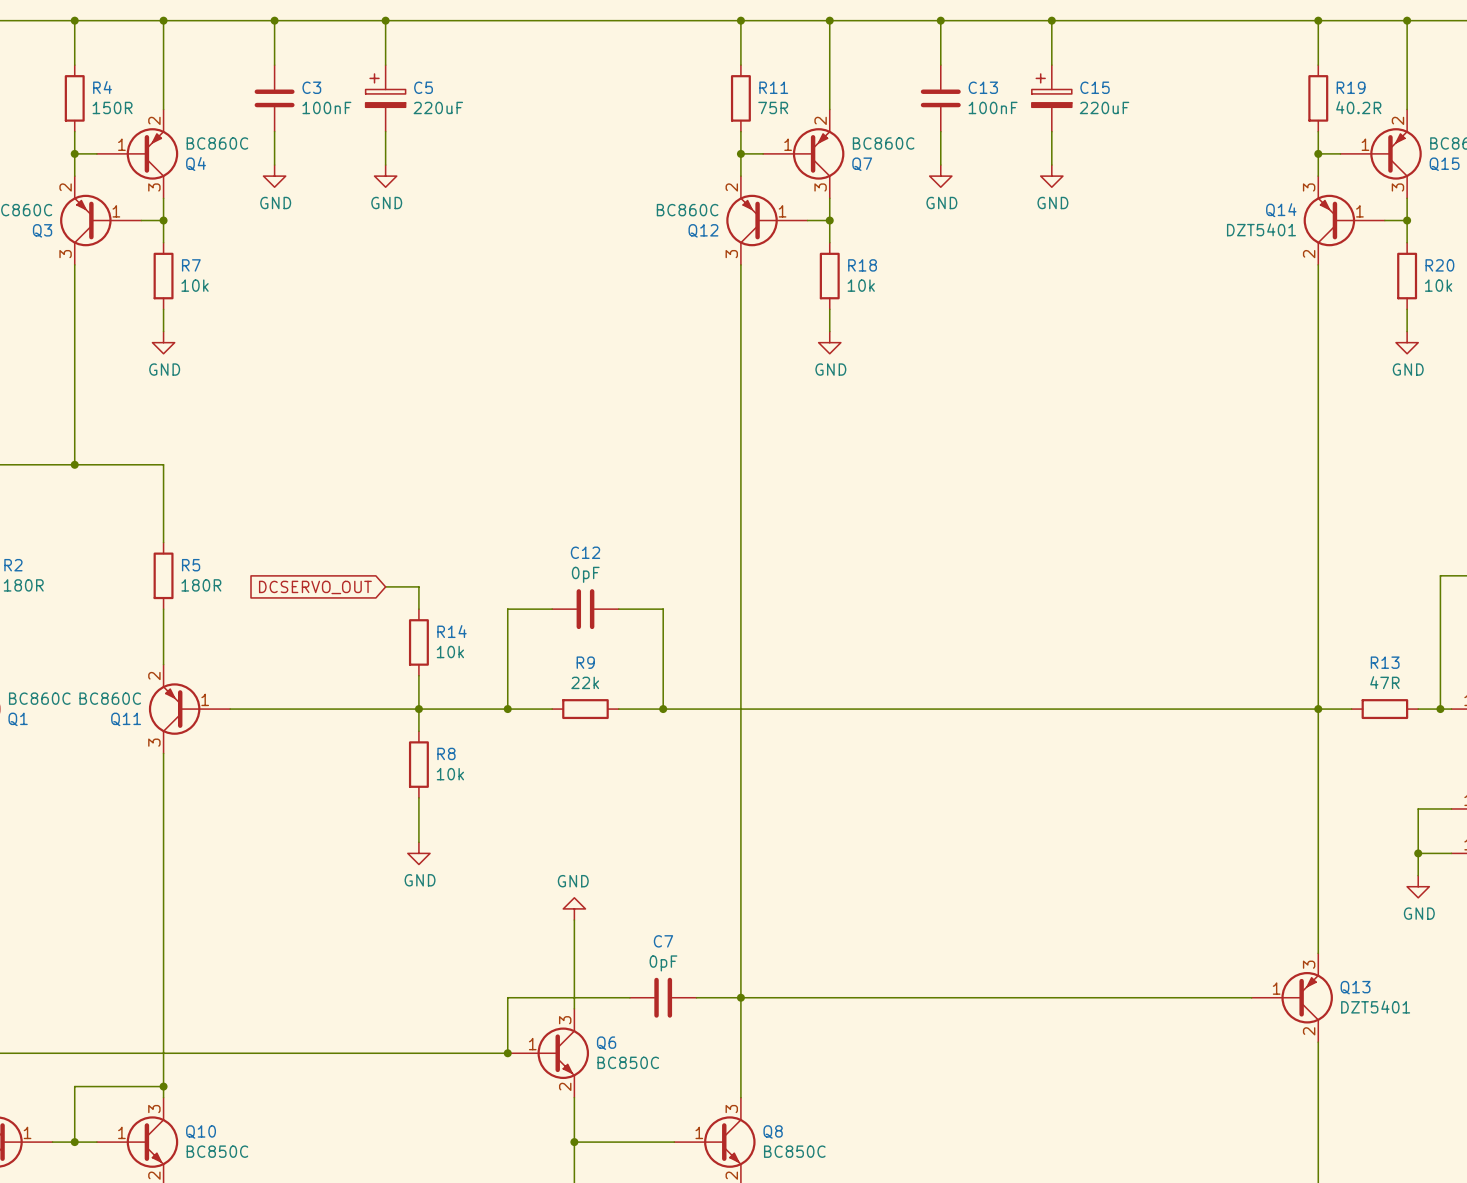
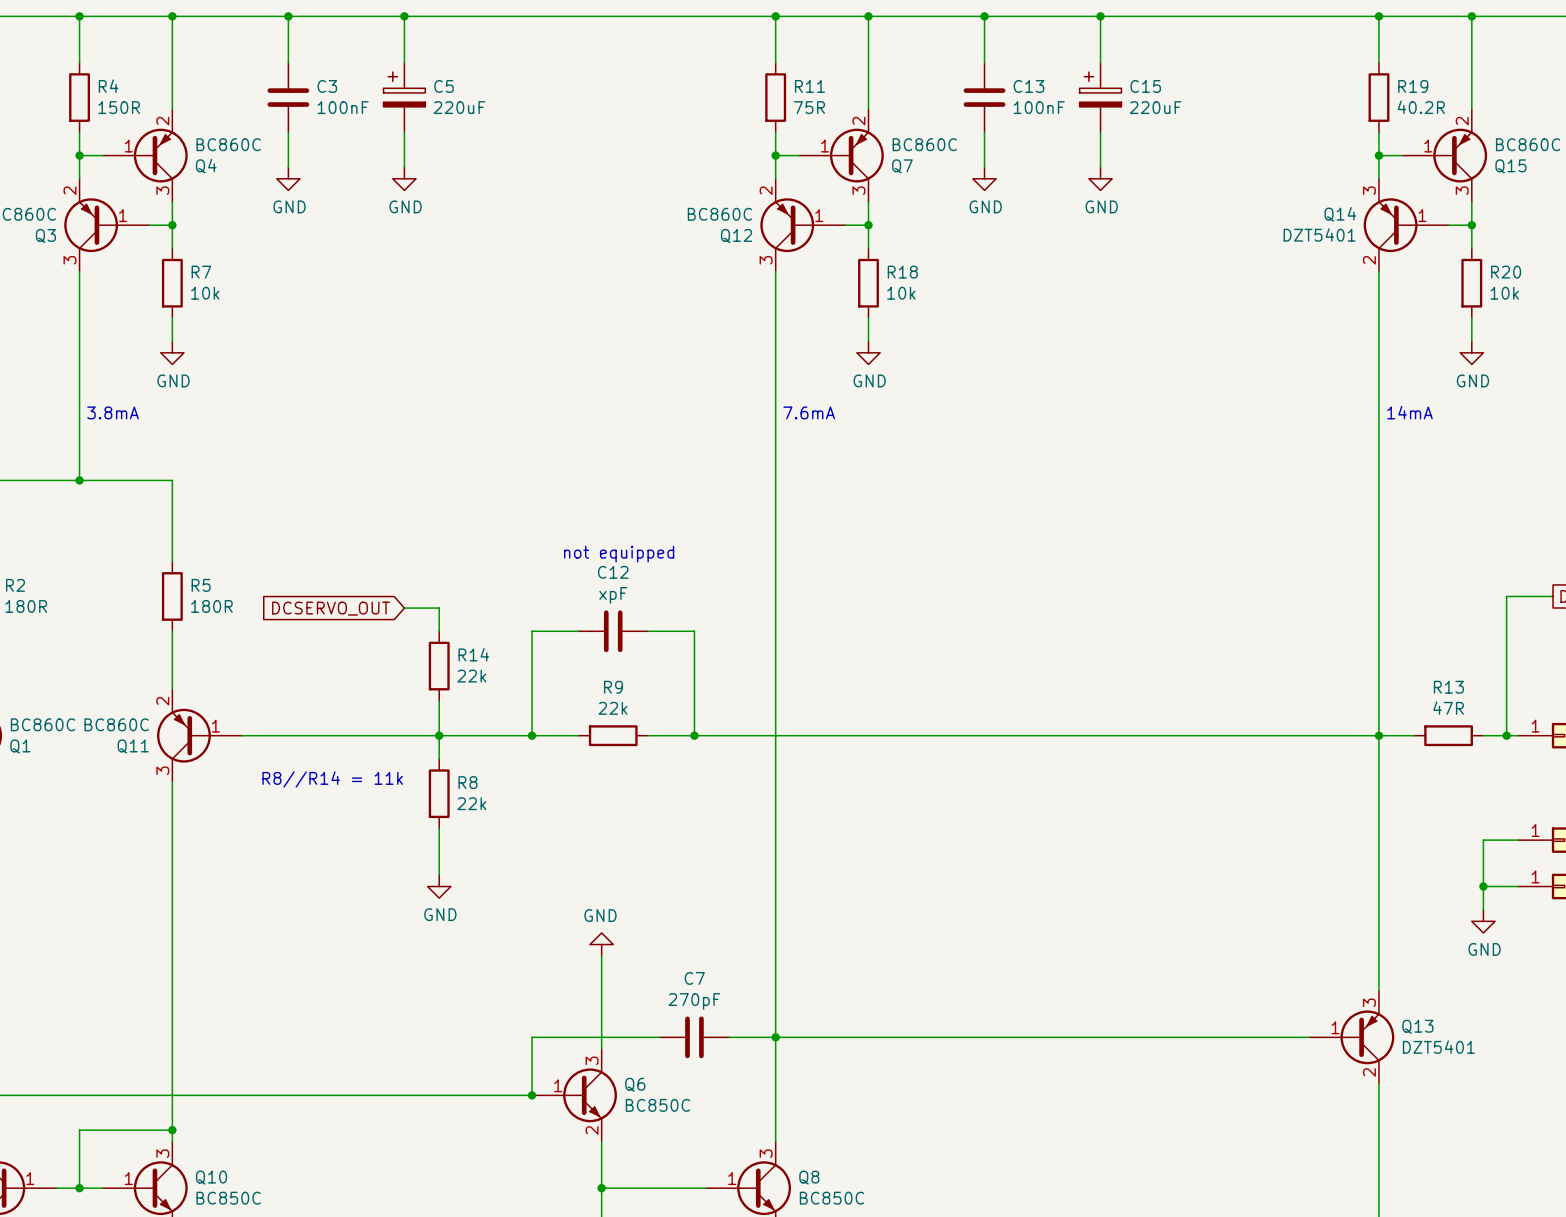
text: none -> 14mA (1410, 412)
text: none -> 3.8mA (113, 412)
text: none -> 7.6mA (809, 412)
text: none -> not equipped (619, 554)
C12 value: 0pF (585, 574) -> xpF (613, 595)
R14 value: 10k (450, 652) -> 22k (471, 676)
text: none -> R8//R14 = 11k (332, 779)
R8 value: 10k (450, 774) -> 22k (471, 803)
C7 value: 0pF (663, 963) -> 270pF (694, 1001)

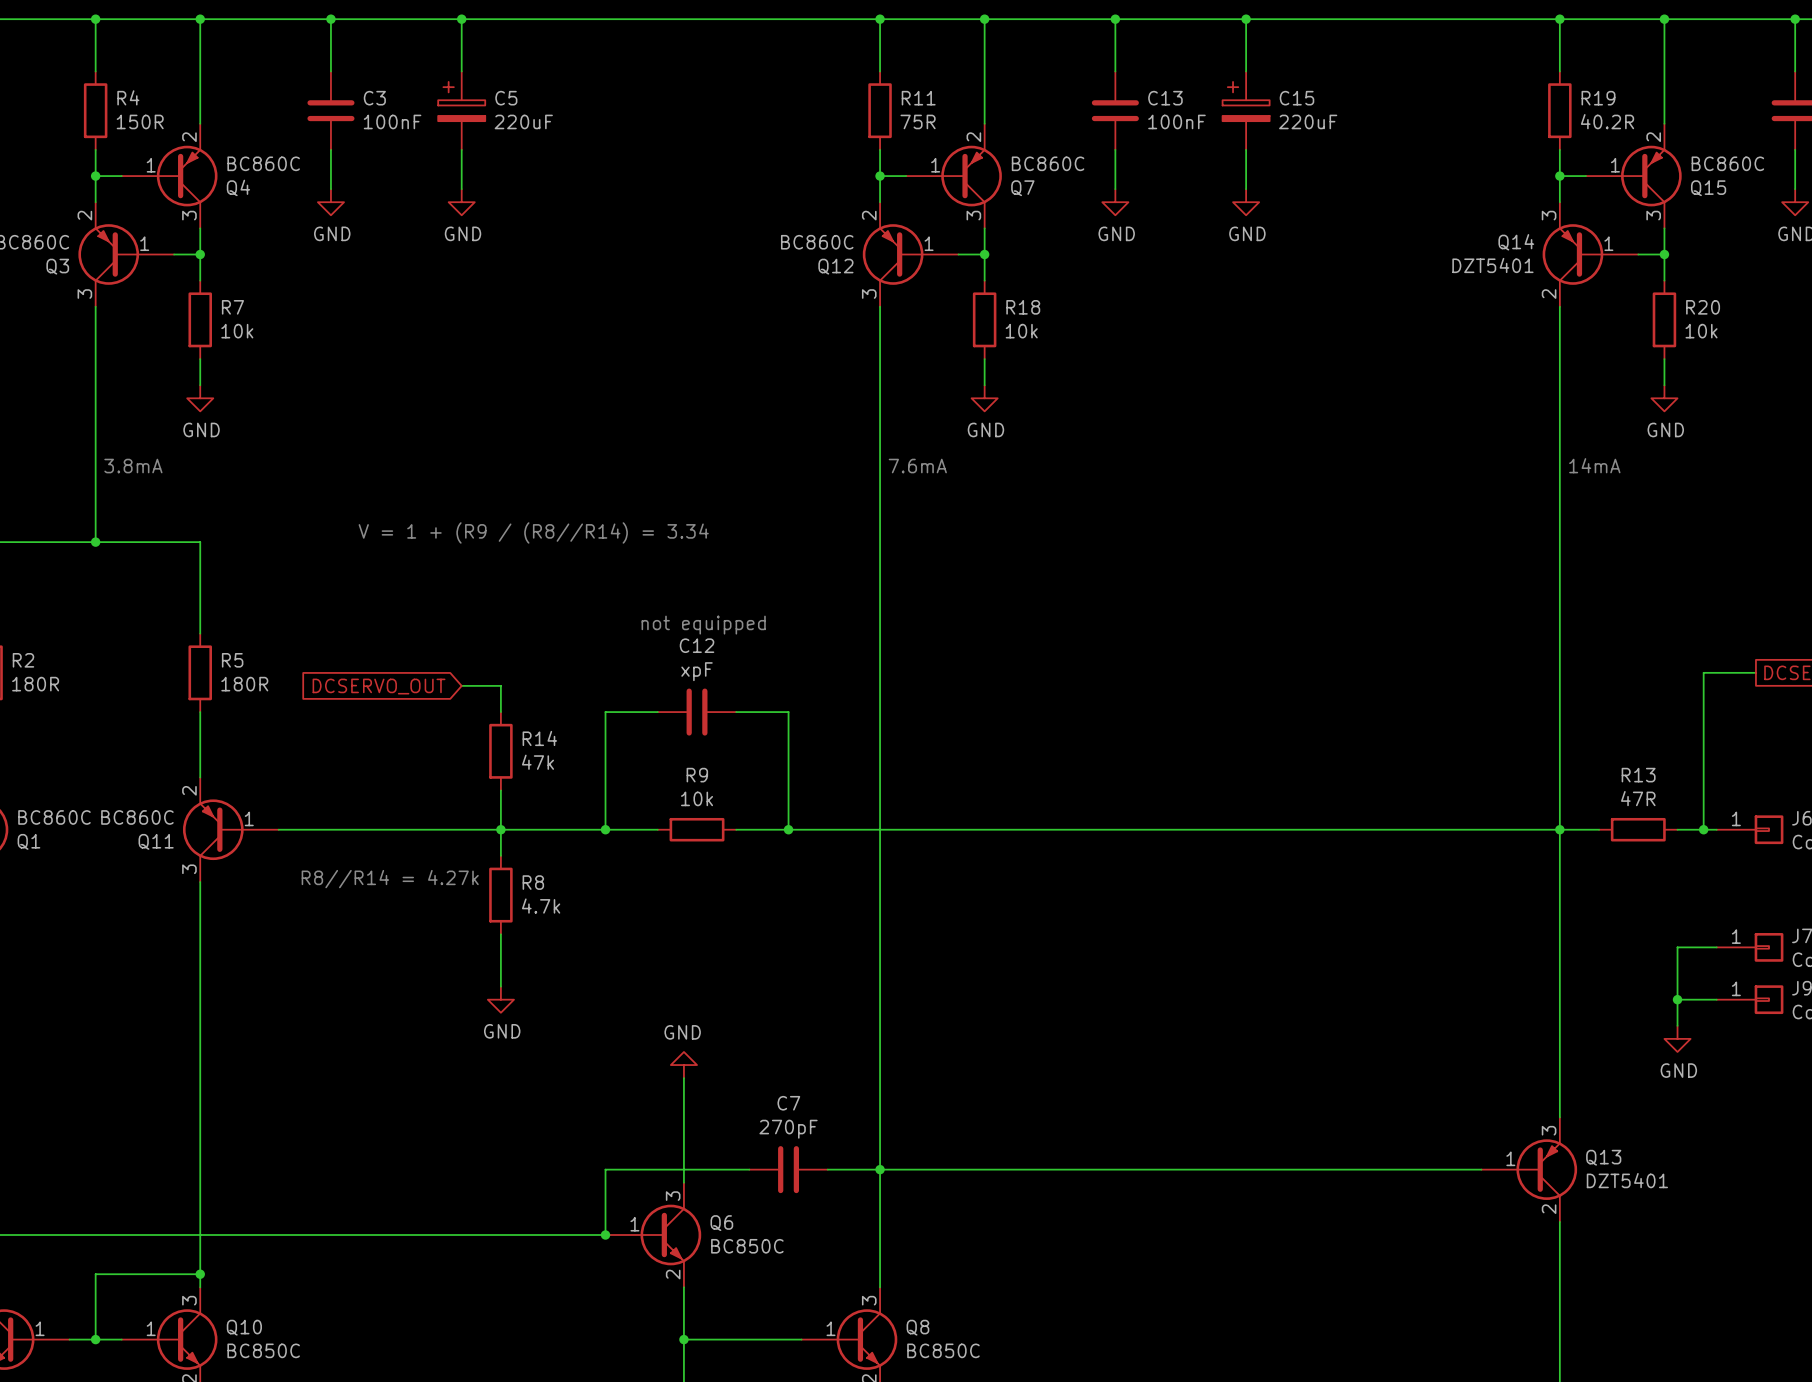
text: none -> V = 1 + (R9 / (R8//R14) = 3.34 (533, 532)
R14 value: 22k (471, 676) -> 47k (538, 762)
R9 value: 22k (612, 708) -> 10k (697, 798)
text: R8//R14 = 11k (332, 779) -> R8//R14 = 4.27k (390, 879)
R8 value: 22k (471, 803) -> 4.7k (541, 906)

